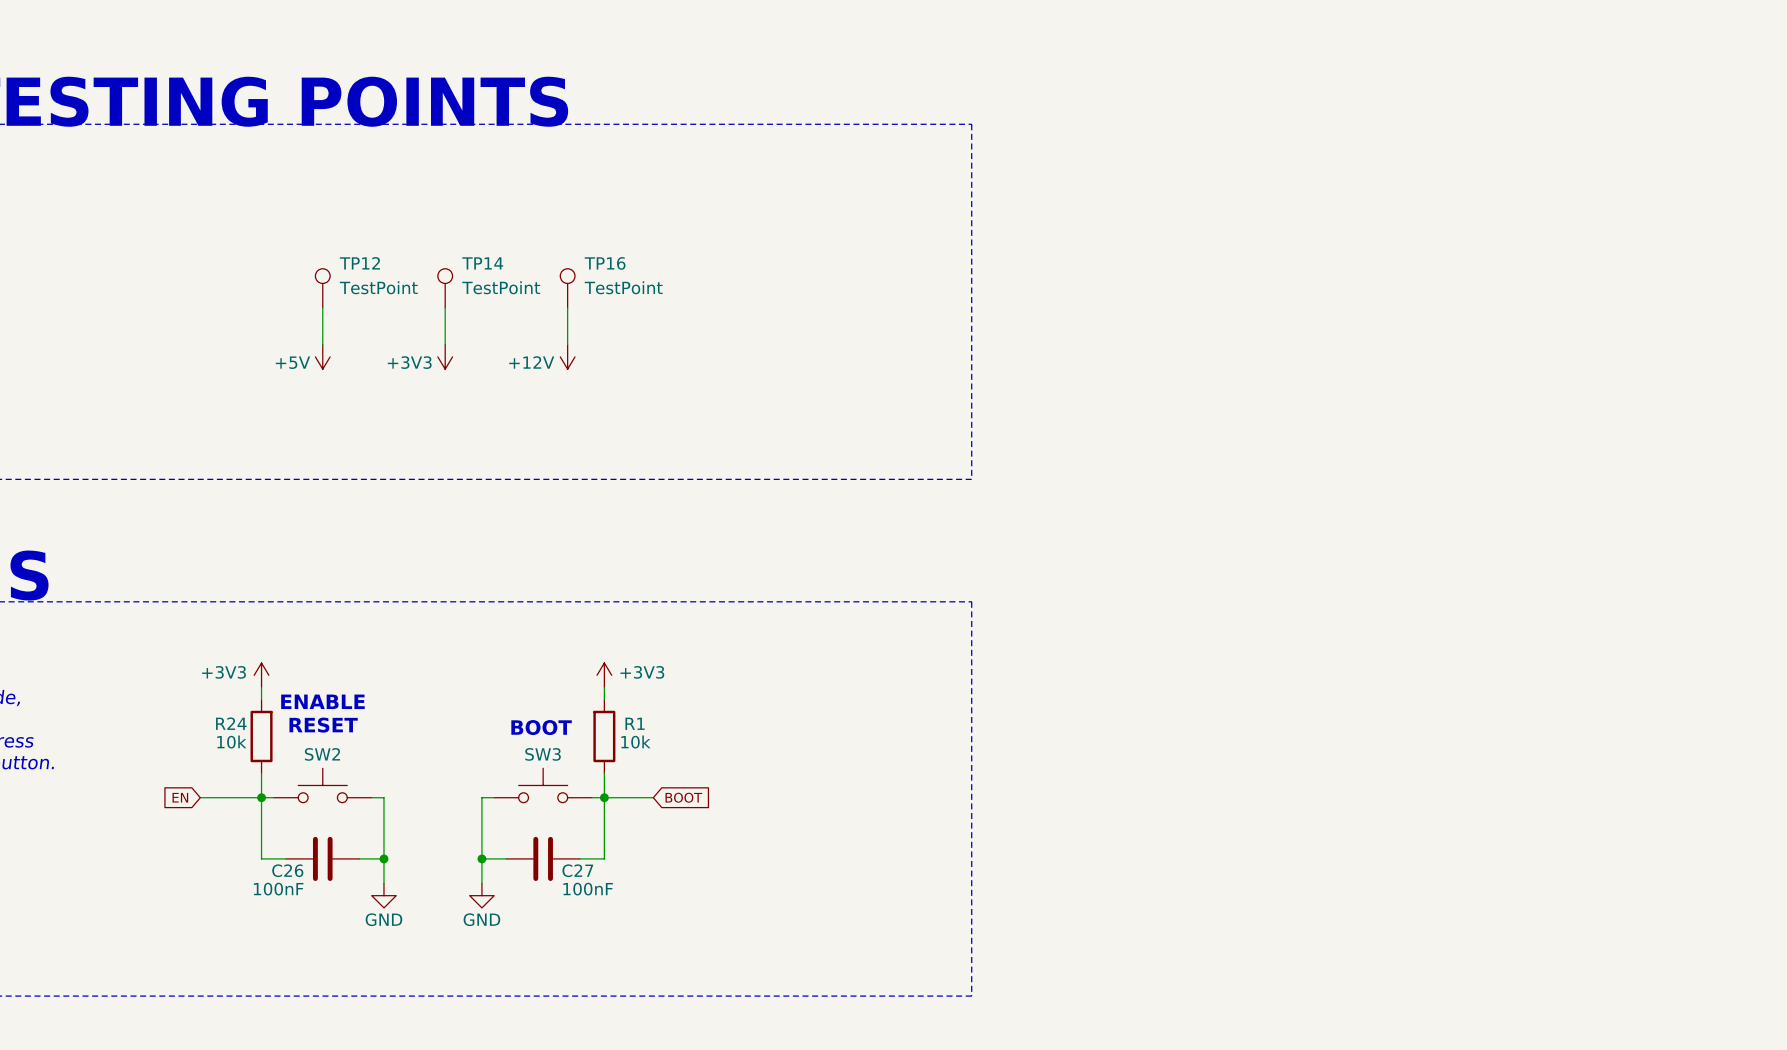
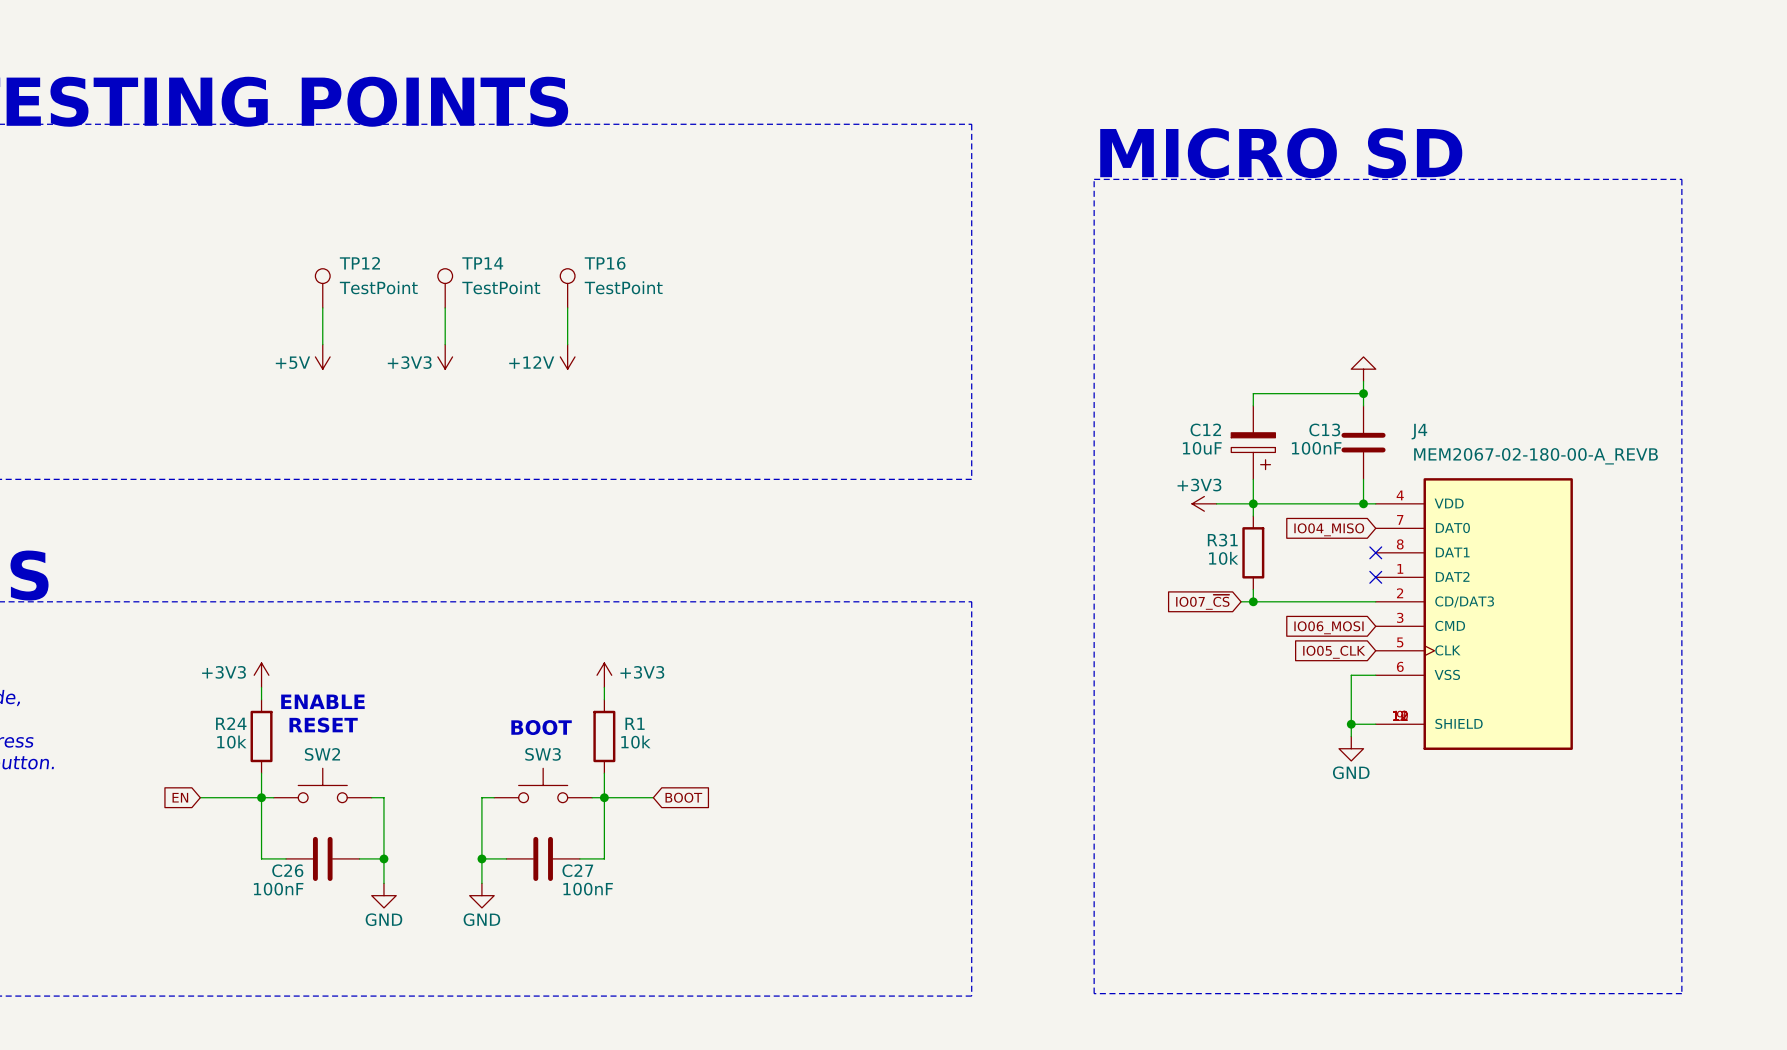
text: none -> MICRO SD (1281, 153)
line: none -> (1094, 179) (1681, 179) (1681, 993) (1094, 993) (1094, 179)
power symbol: none -> (1363, 369)
wire: none -> (1363, 381) (1363, 405)
wire: none -> (1363, 393) (1253, 393) (1253, 405)
junction: none -> (1363, 393)
C12: none -> 10uF (1253, 442)
C13: none -> 100nF (1363, 442)
wire: none -> (1253, 479) (1253, 516)
wire: none -> (1363, 479) (1363, 503)
power symbol: none -> +3V3 (1204, 503)
wire: none -> (1216, 503) (1375, 503)
junction: none -> (1253, 503)
junction: none -> (1363, 503)
global label: none -> IO04_MISO (1329, 529)
R31: none -> 10k (1253, 552)
no-connect mark: none -> (1375, 552)
no-connect mark: none -> (1375, 577)
wire: none -> (1253, 589) (1253, 601)
wire: none -> (1241, 601) (1375, 601)
junction: none -> (1253, 601)
global label: none -> IO07_~{CS} (1202, 602)
J4: none -> MEM2067-02-180-00-A_REVB (1474, 614)
global label: none -> IO06_MOSI (1328, 627)
global label: none -> IO05_CLK (1334, 652)
wire: none -> (1375, 675) (1351, 675) (1351, 736)
wire: none -> (1351, 724) (1375, 724)
junction: none -> (1351, 724)
power symbol: none -> GND (1351, 748)

